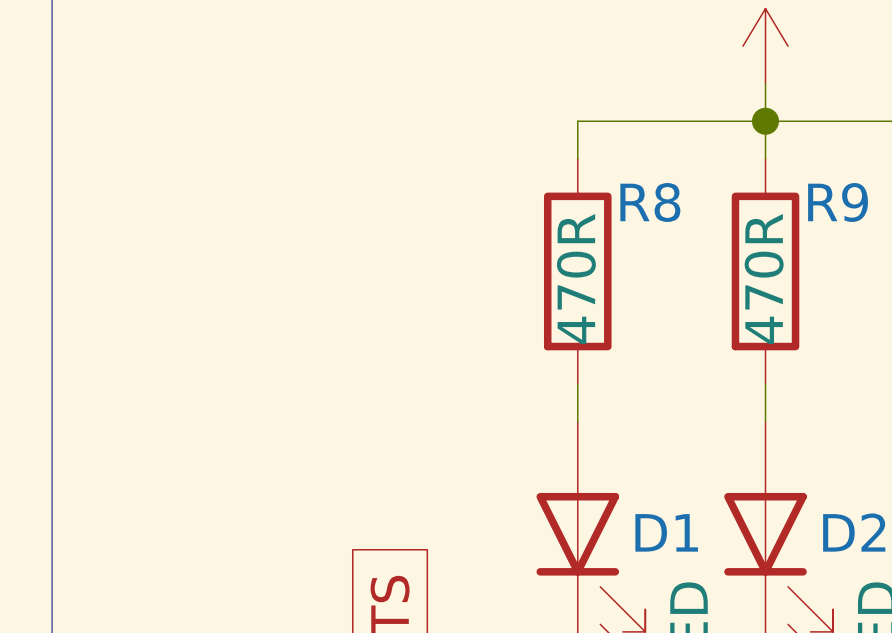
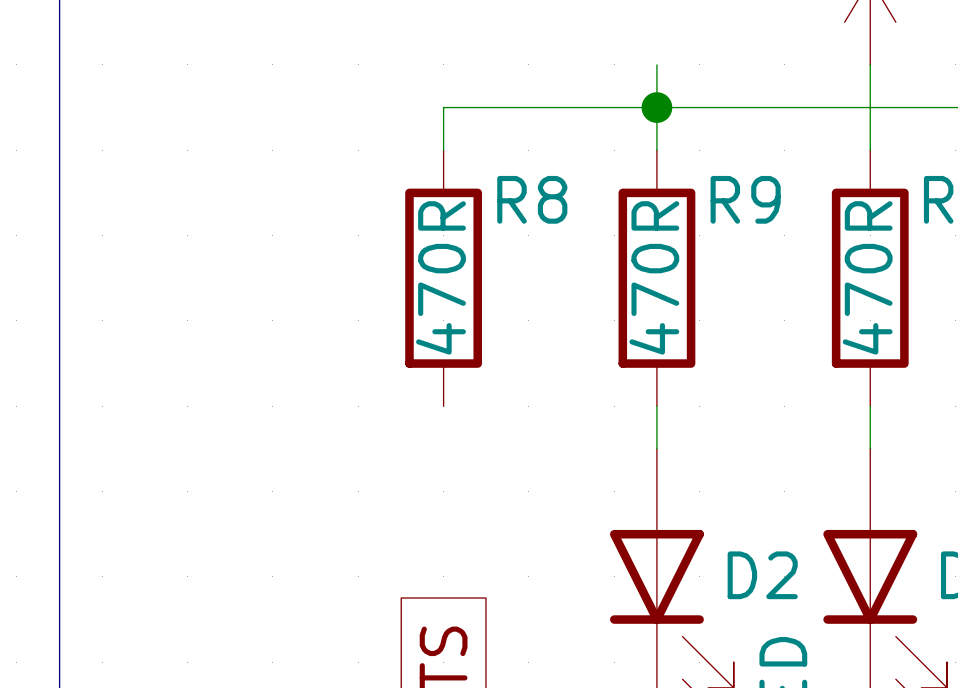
wire: none -> (656, 64) (656, 107) (443, 107) (443, 150)
junction: none -> (656, 107)
junction: (765, 121) -> none
R8 name: R8 (650, 202) -> R9 (745, 199)
R8: none -> 470R (443, 278)
D1 name: D1 (666, 532) -> D2 (762, 575)

